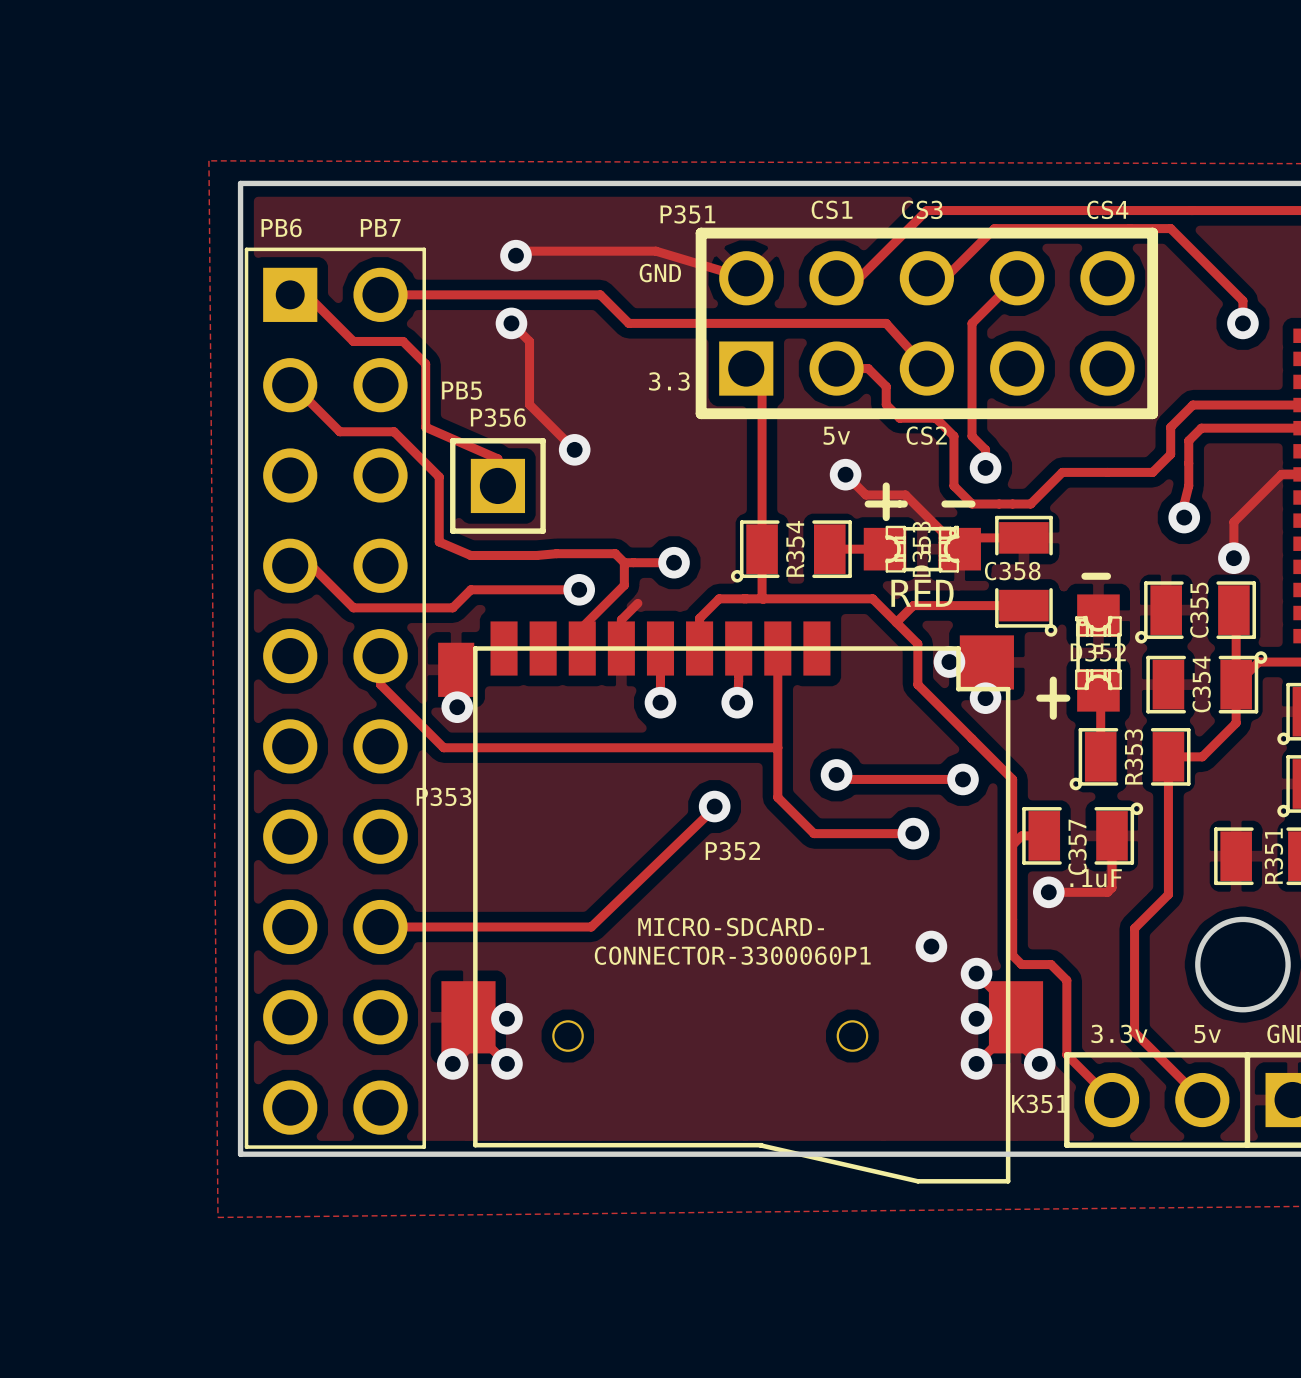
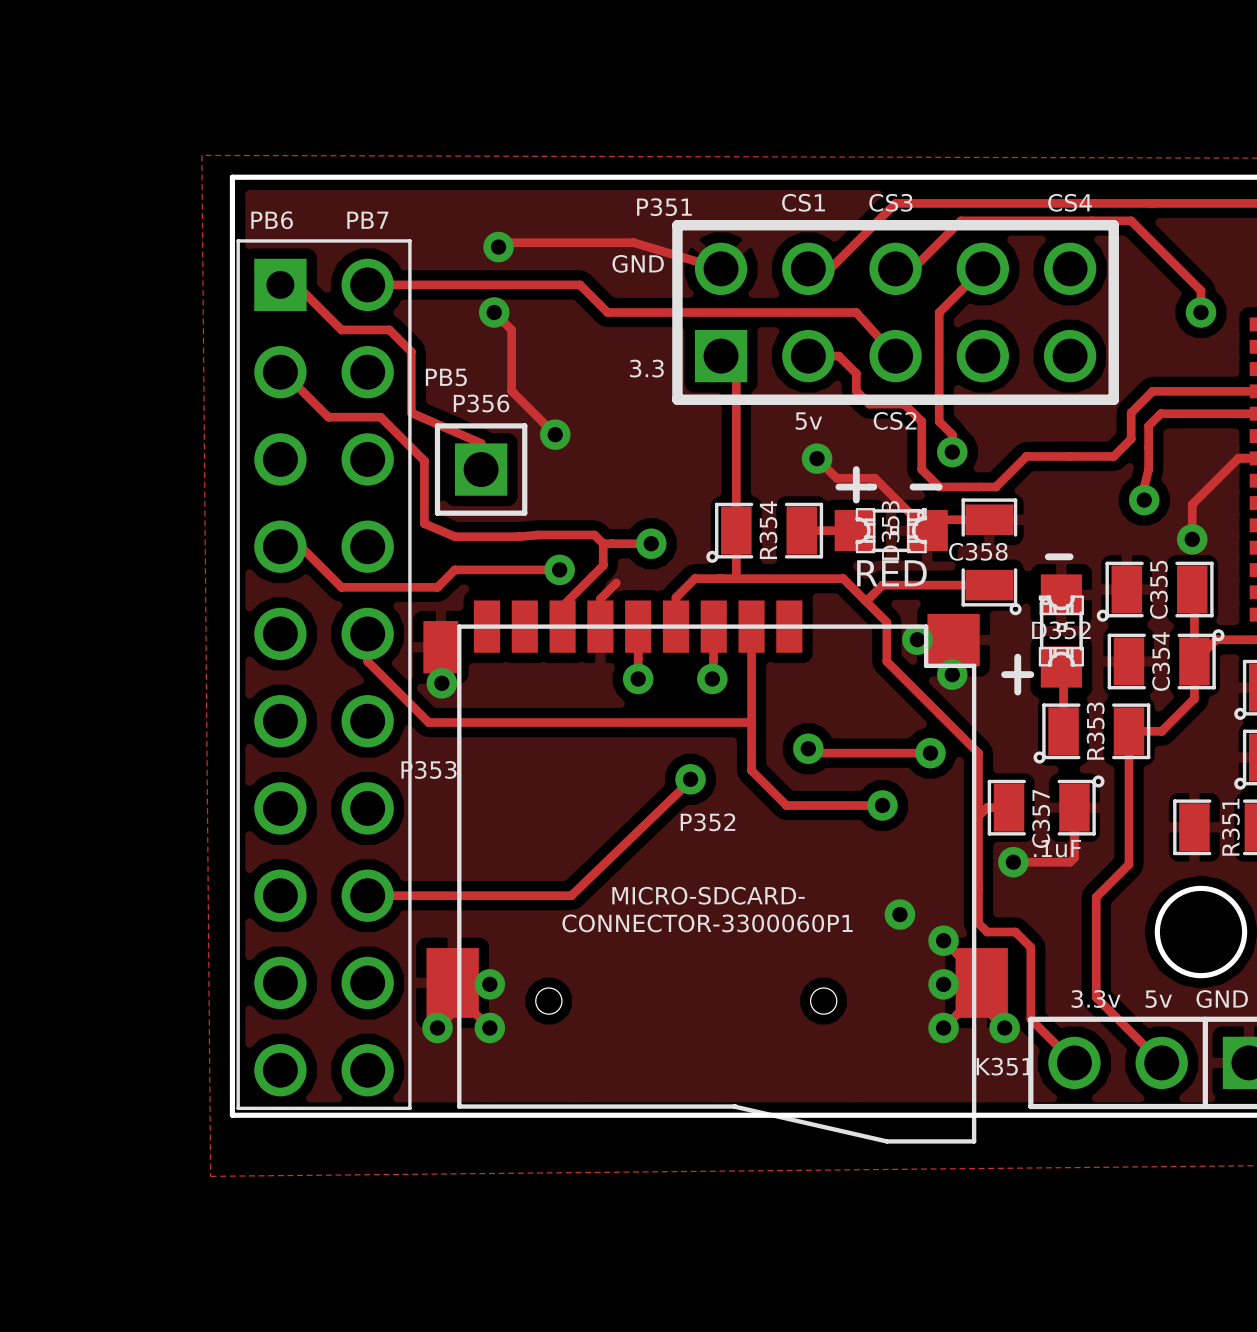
P352 footprint: [438, 621, 1044, 1184] -> [423, 600, 1008, 1144]

